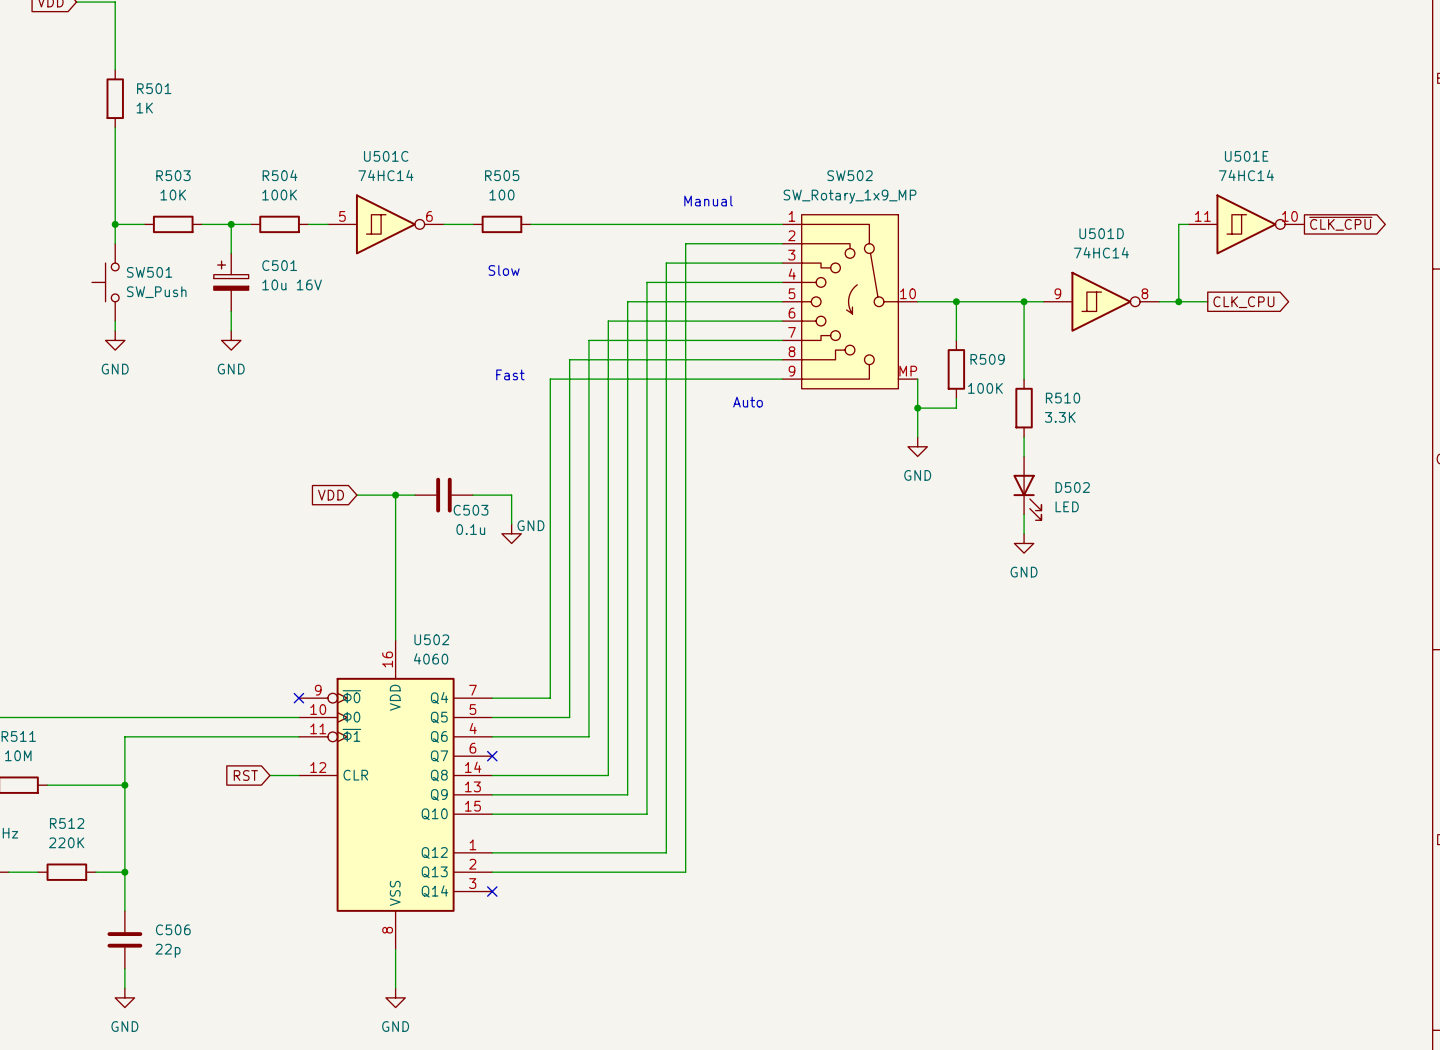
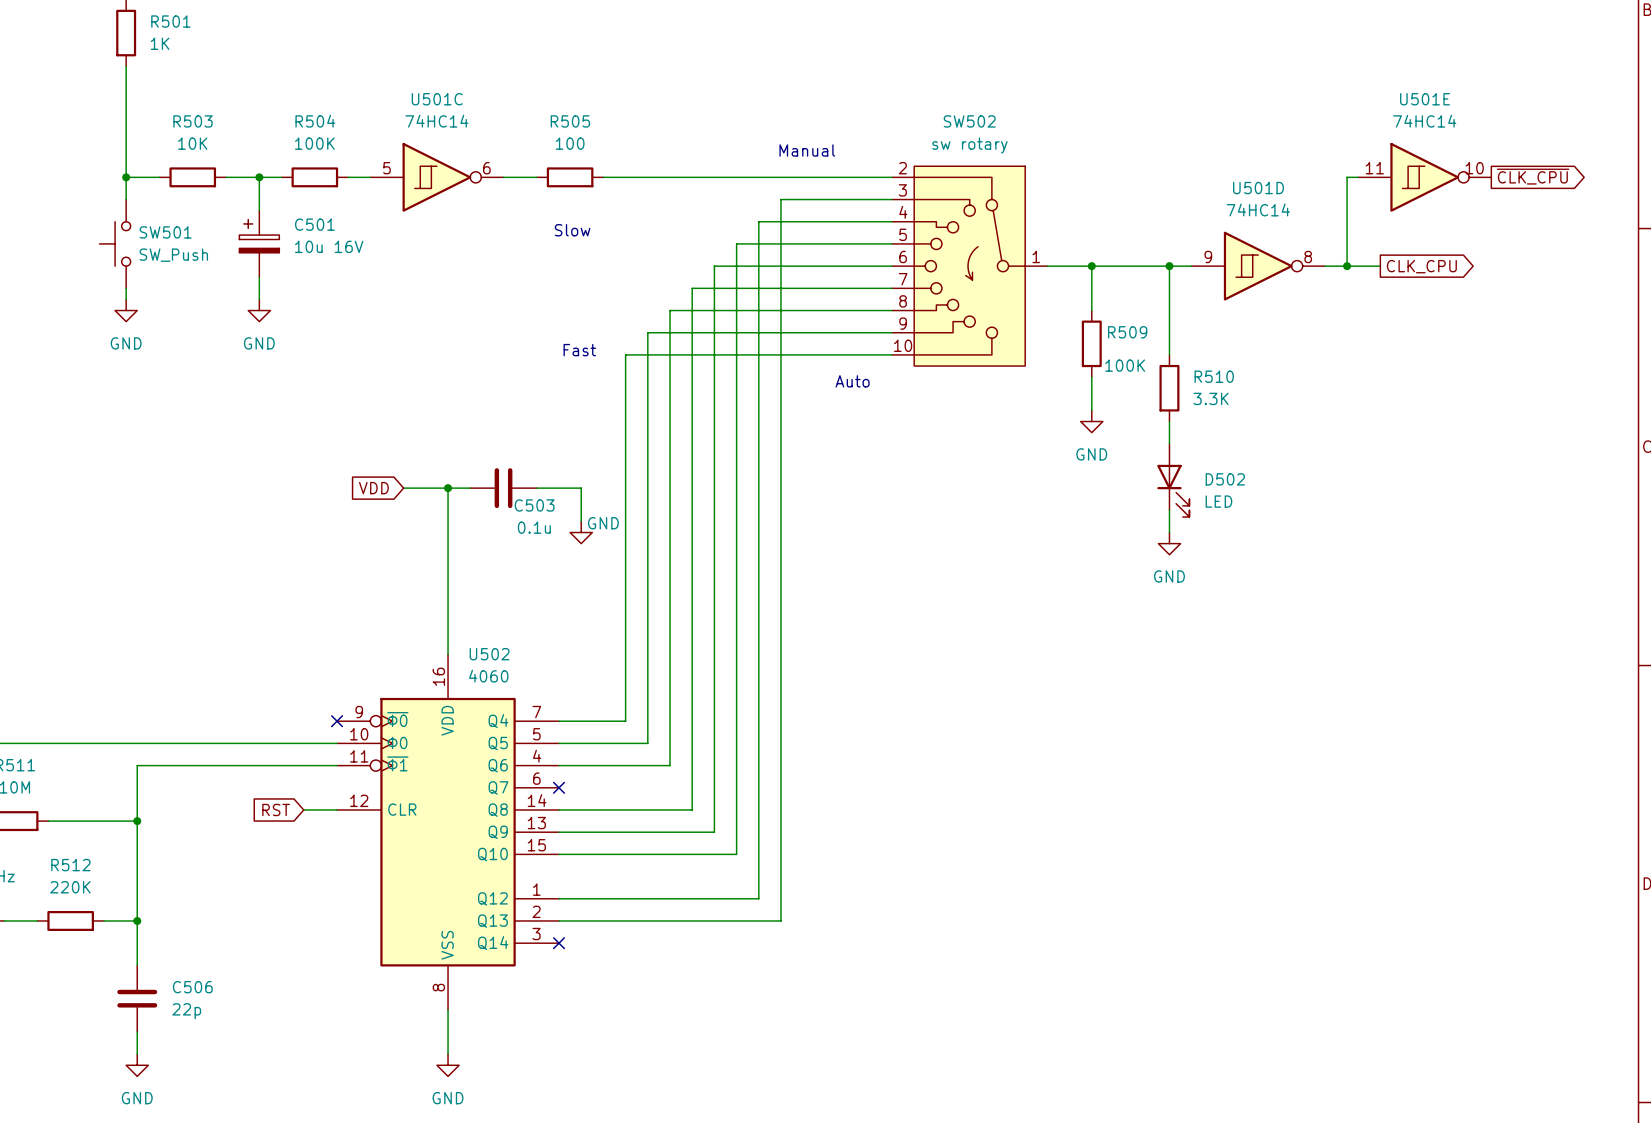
SW502 value: SW_Rotary_1x9_MP (850, 196) -> sw rotary (969, 145)
SW502 symbol: [782, 214, 918, 389] -> [891, 166, 1048, 367]
wire: (917, 379) (917, 437) -> none
wire: (917, 408) (956, 408) -> (1091, 410) (1091, 388)
junction: (917, 408) -> none
power symbol position: GND (917, 446) -> GND (1091, 421)

